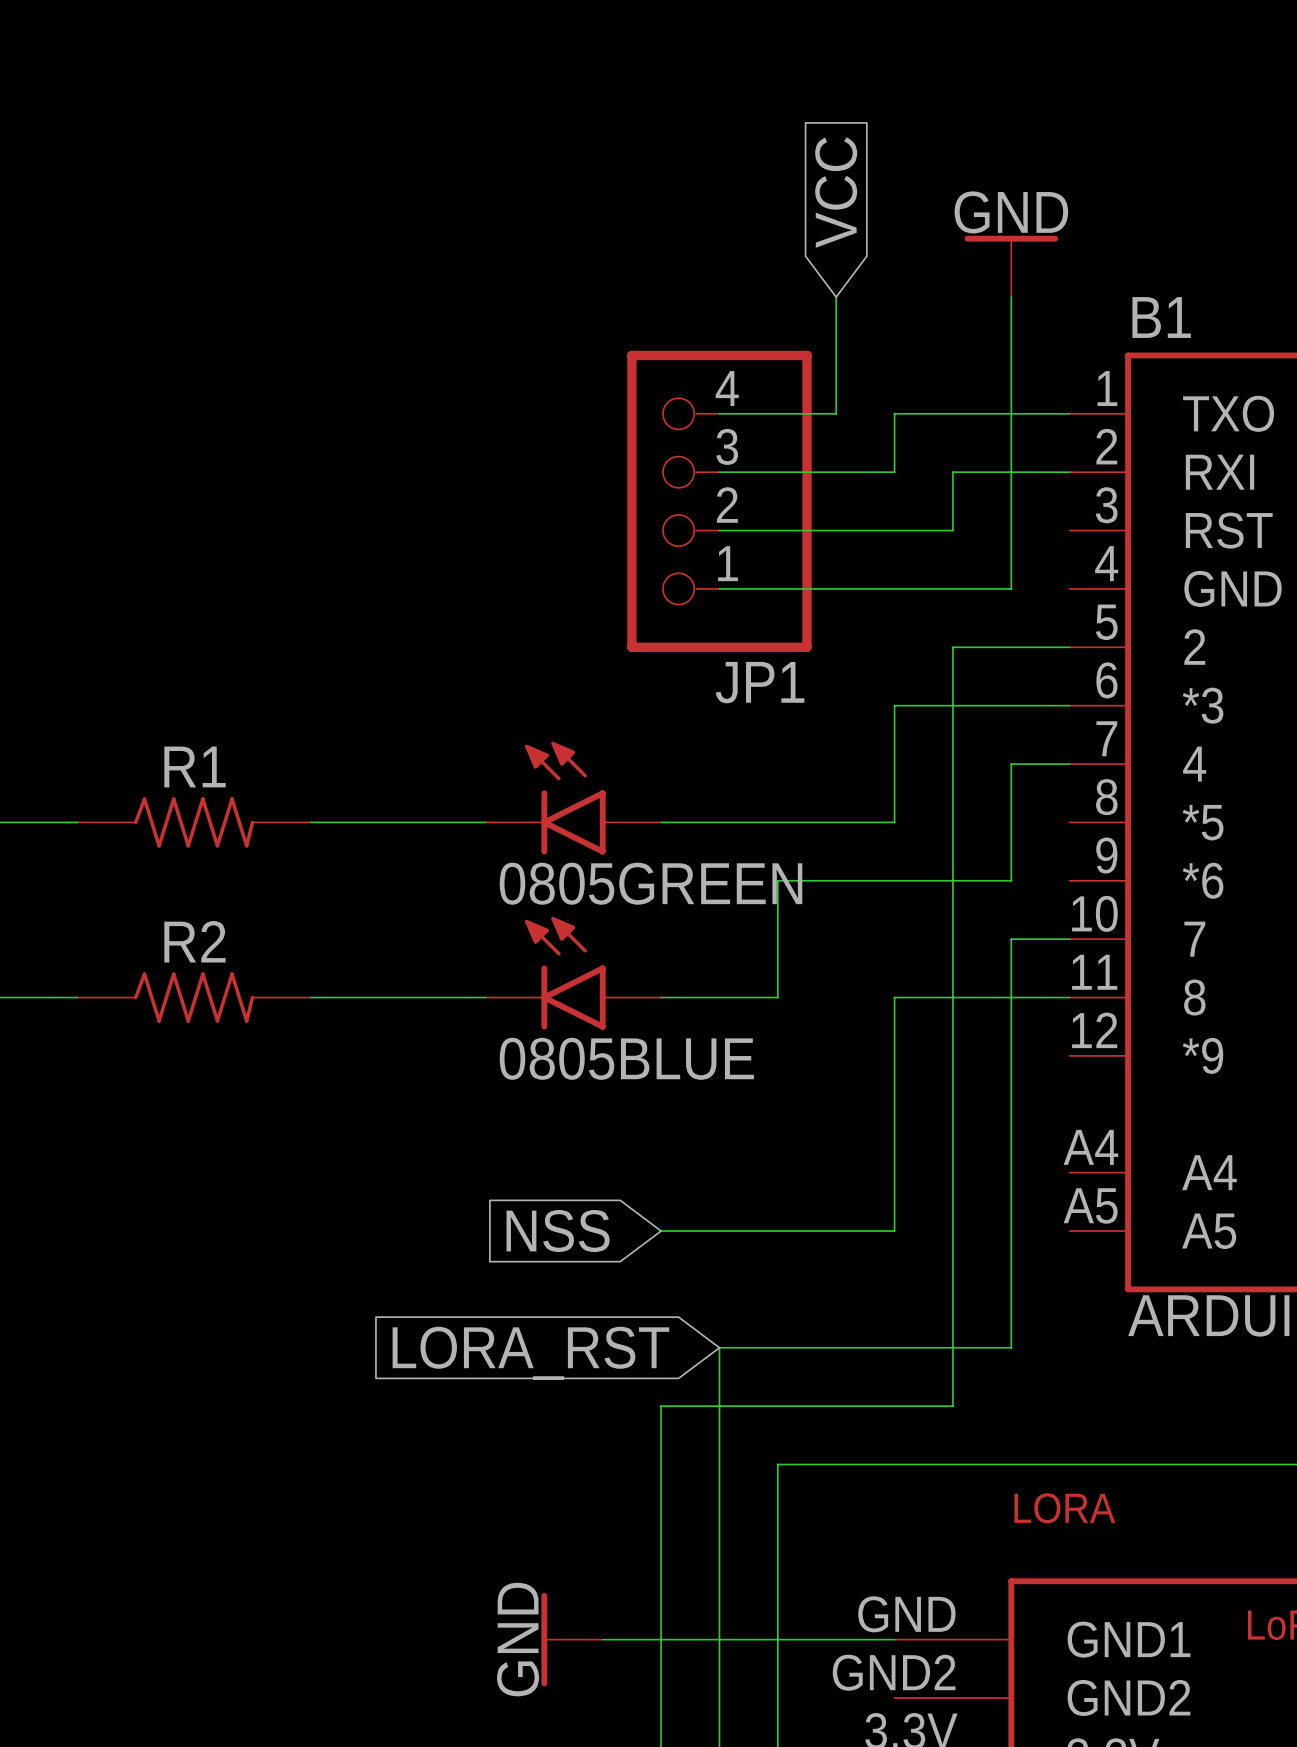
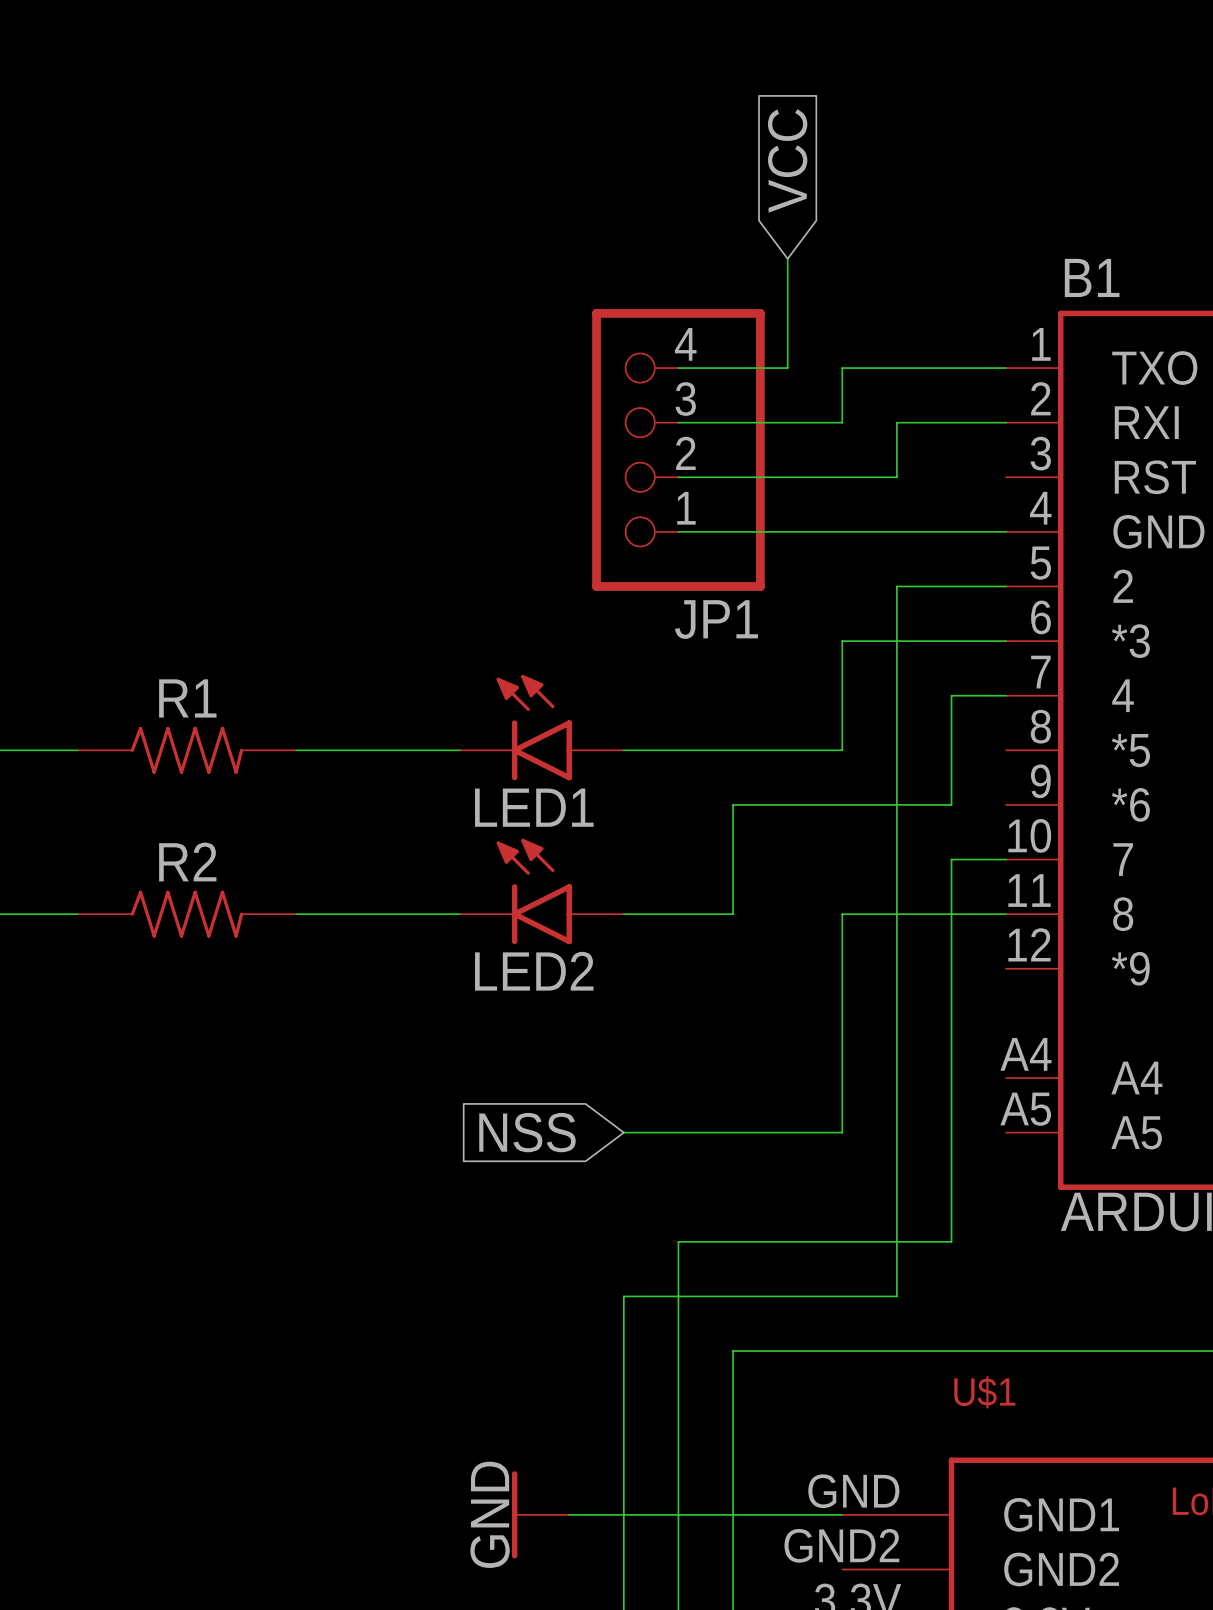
power symbol: GND (1011, 266) -> none
wire: (1011, 297) (1011, 588) -> (1006, 531) (951, 531)
0805GREEN name: 0805GREEN (651, 883) -> LED1 (534, 807)
0805BLUE name: 0805BLUE (626, 1058) -> LED2 (534, 971)
global label: LORA_RST (530, 1353) -> none
LORA name: LORA (1064, 1508) -> U$1 (984, 1392)

